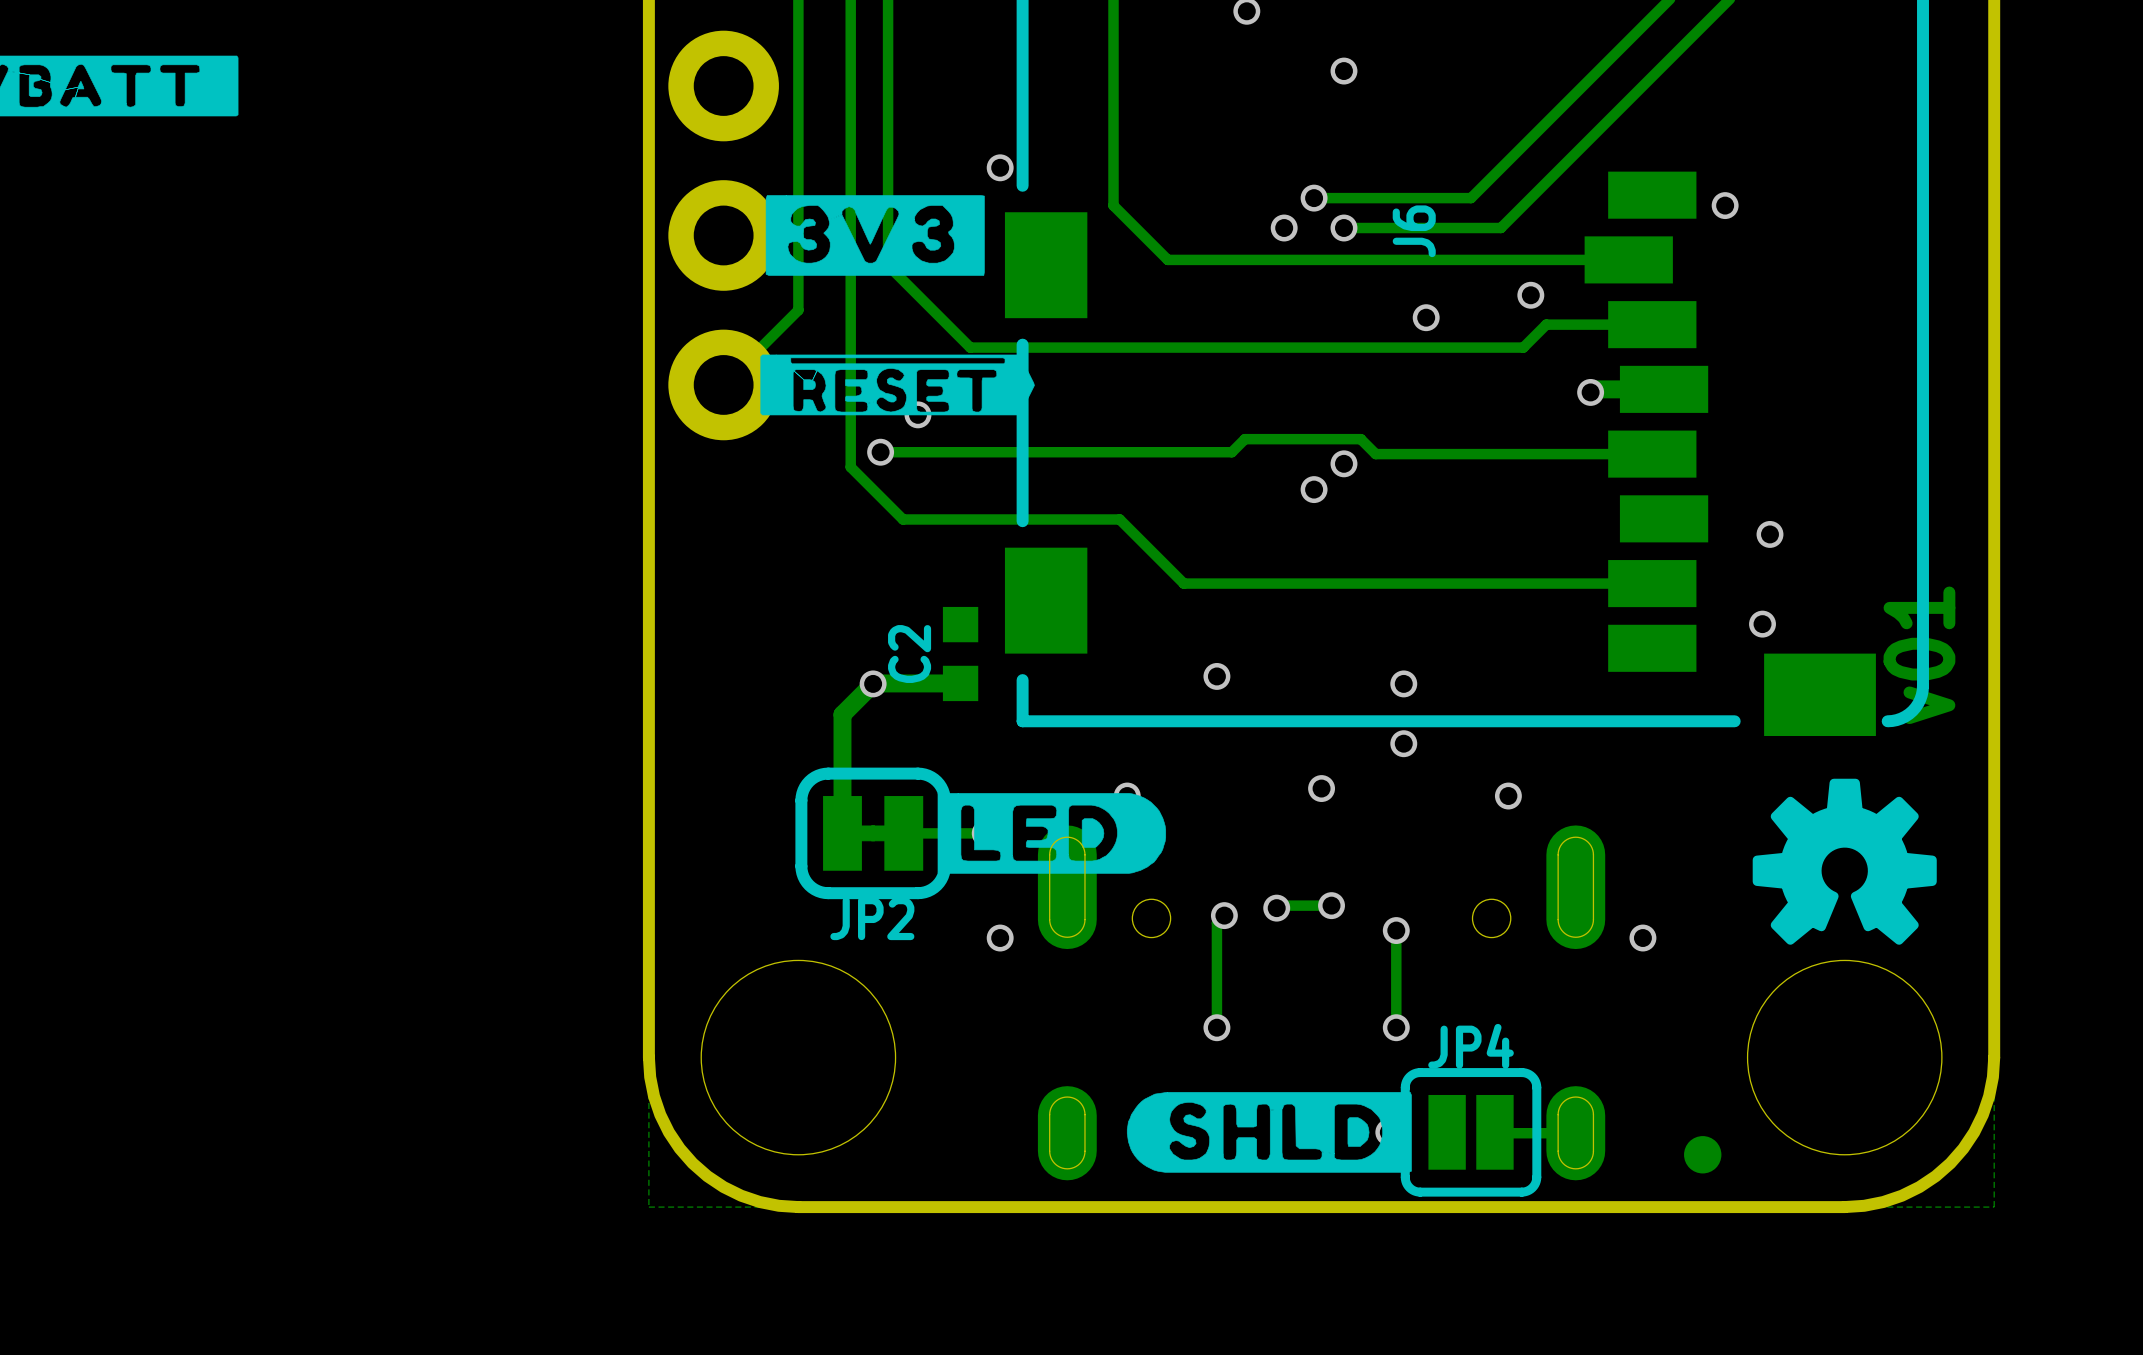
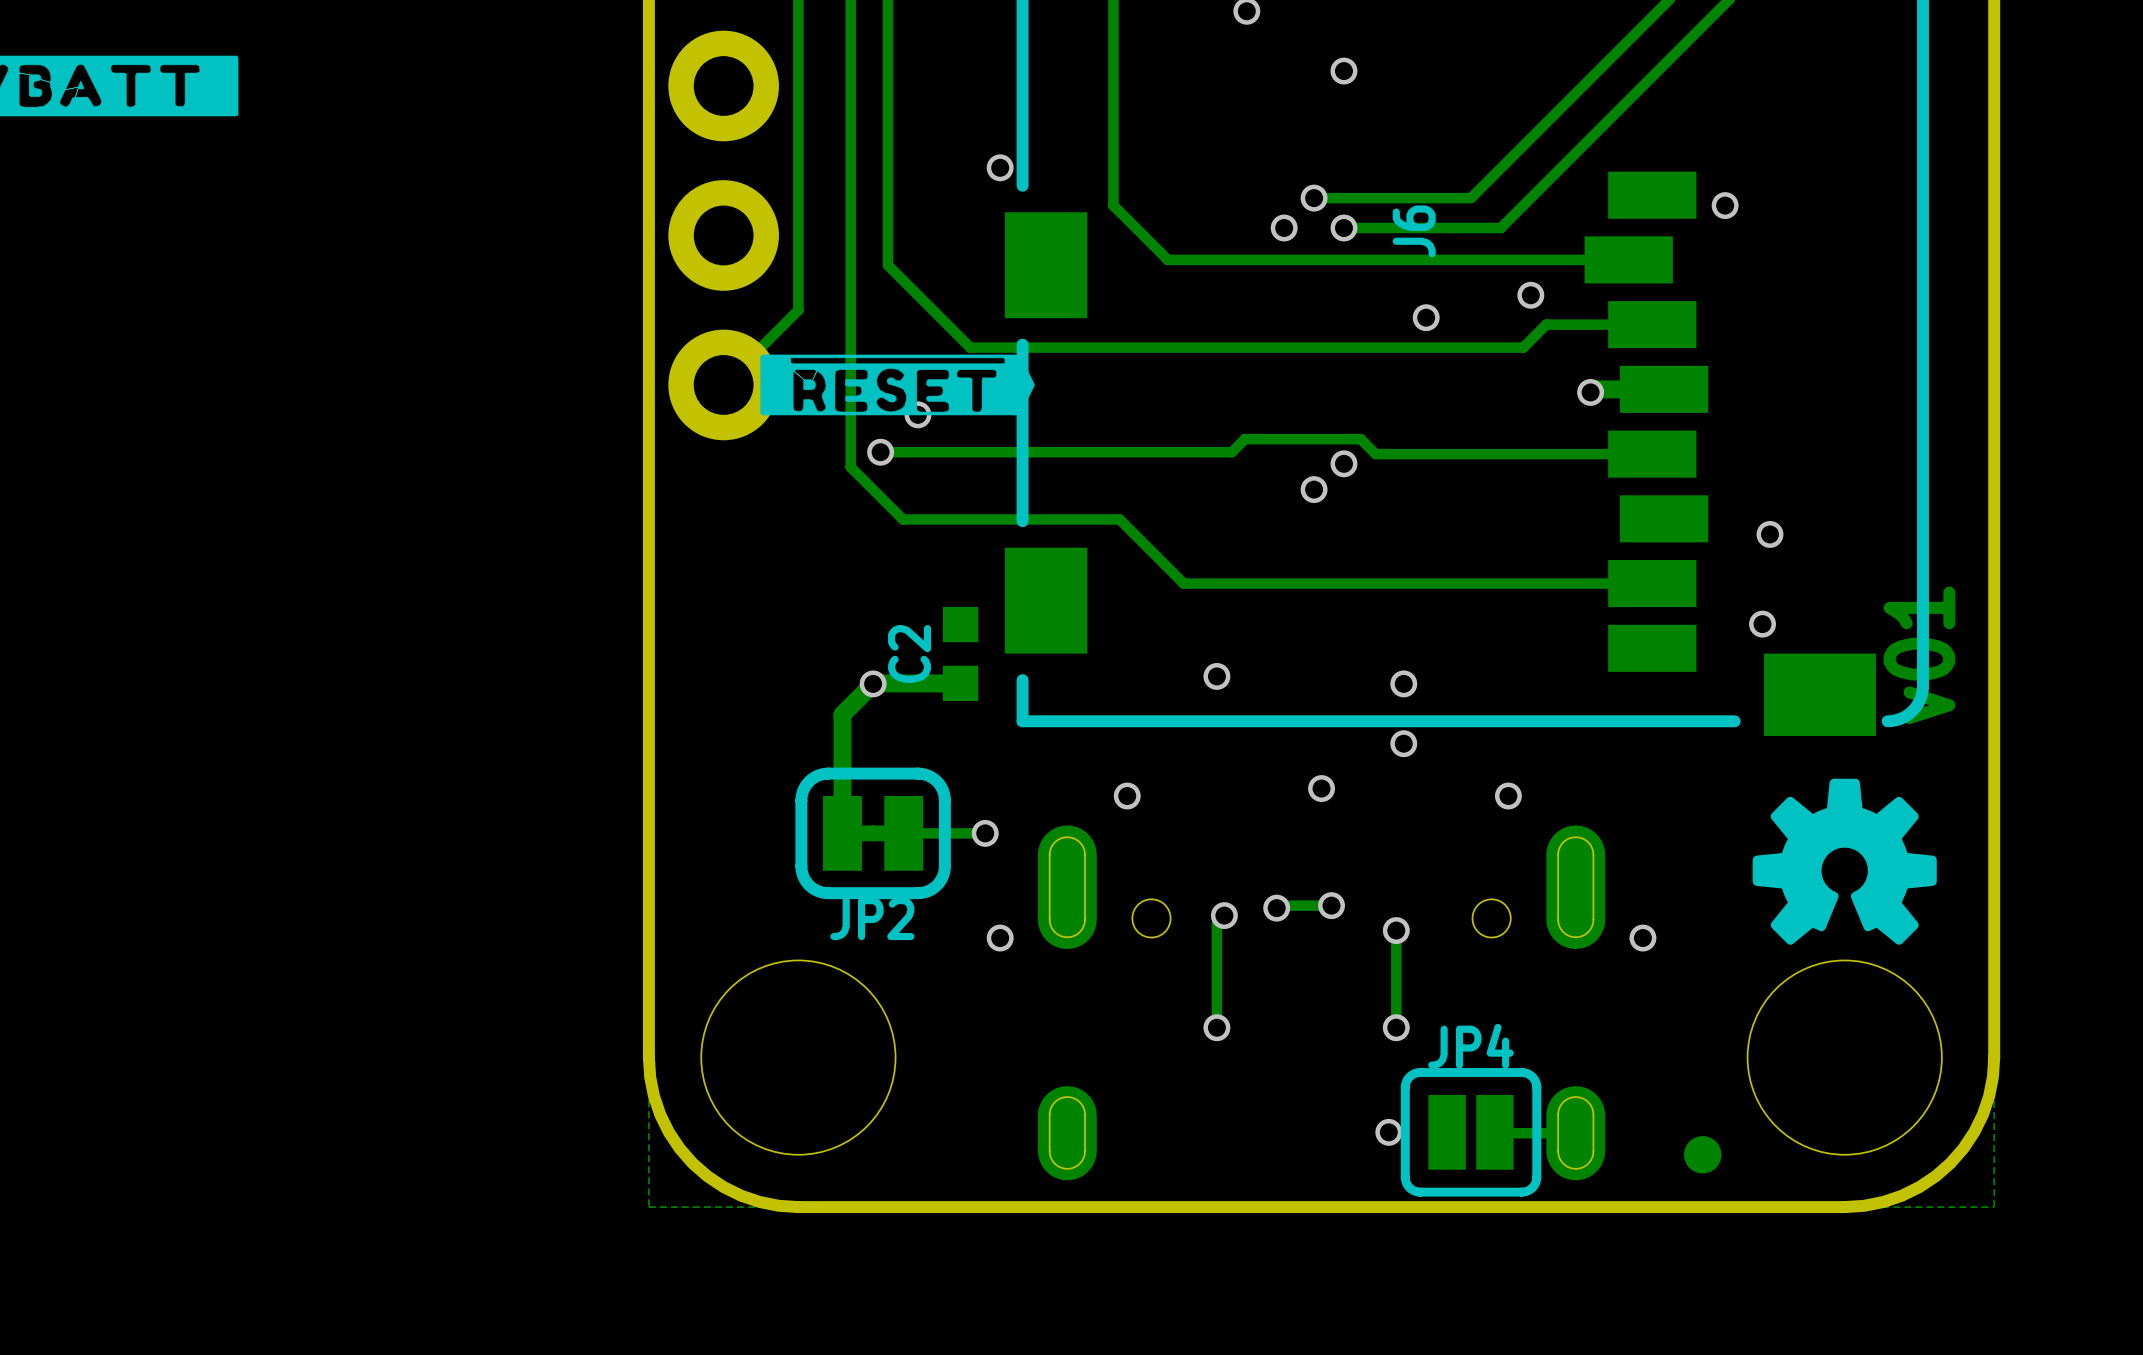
drawing: [765, 195, 985, 276] -> none
drawing: [937, 793, 1167, 874] -> none
drawing: [1126, 1092, 1412, 1173] -> none

